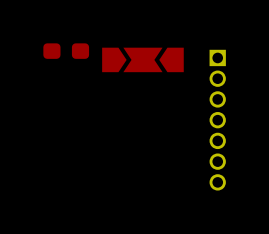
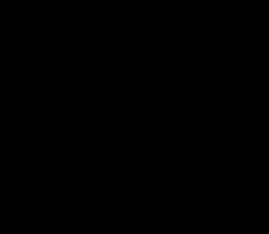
part: (66, 51) -> none
part: (142, 59) -> none
part: (217, 120) -> none

